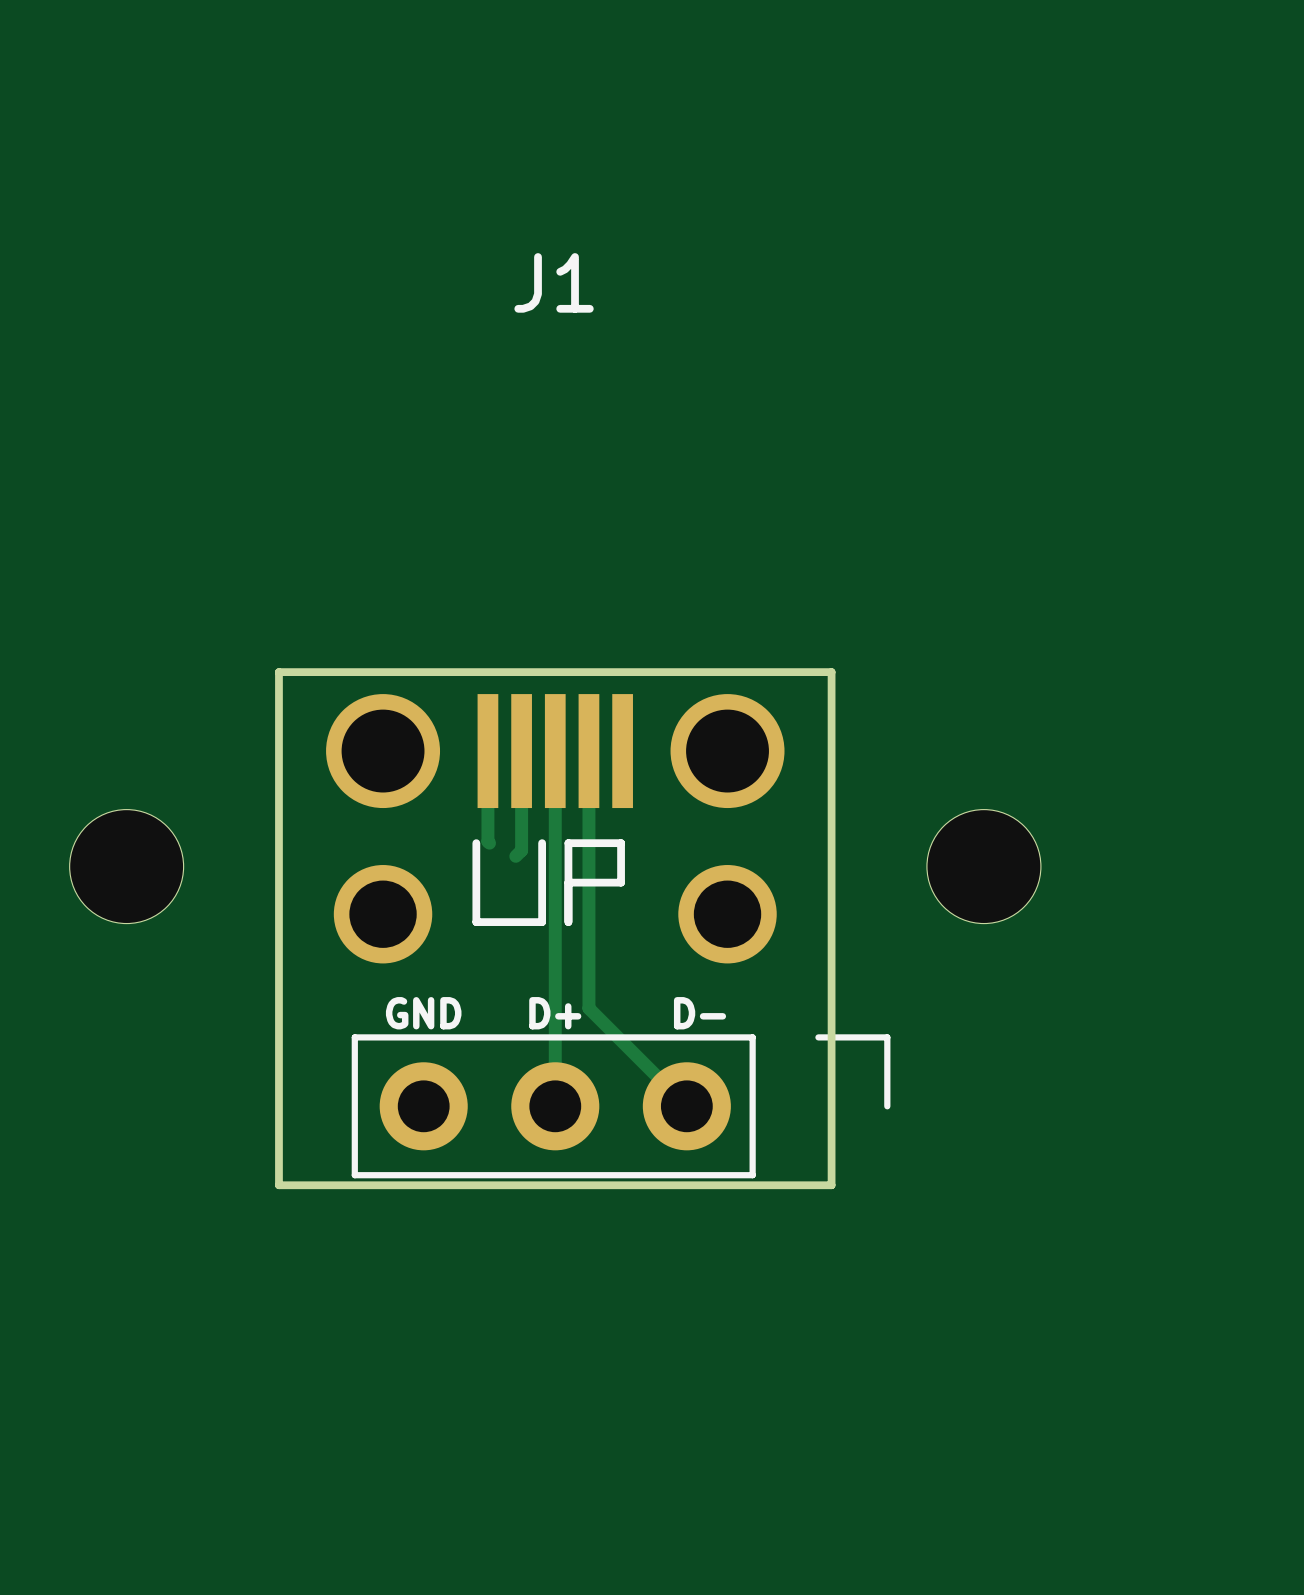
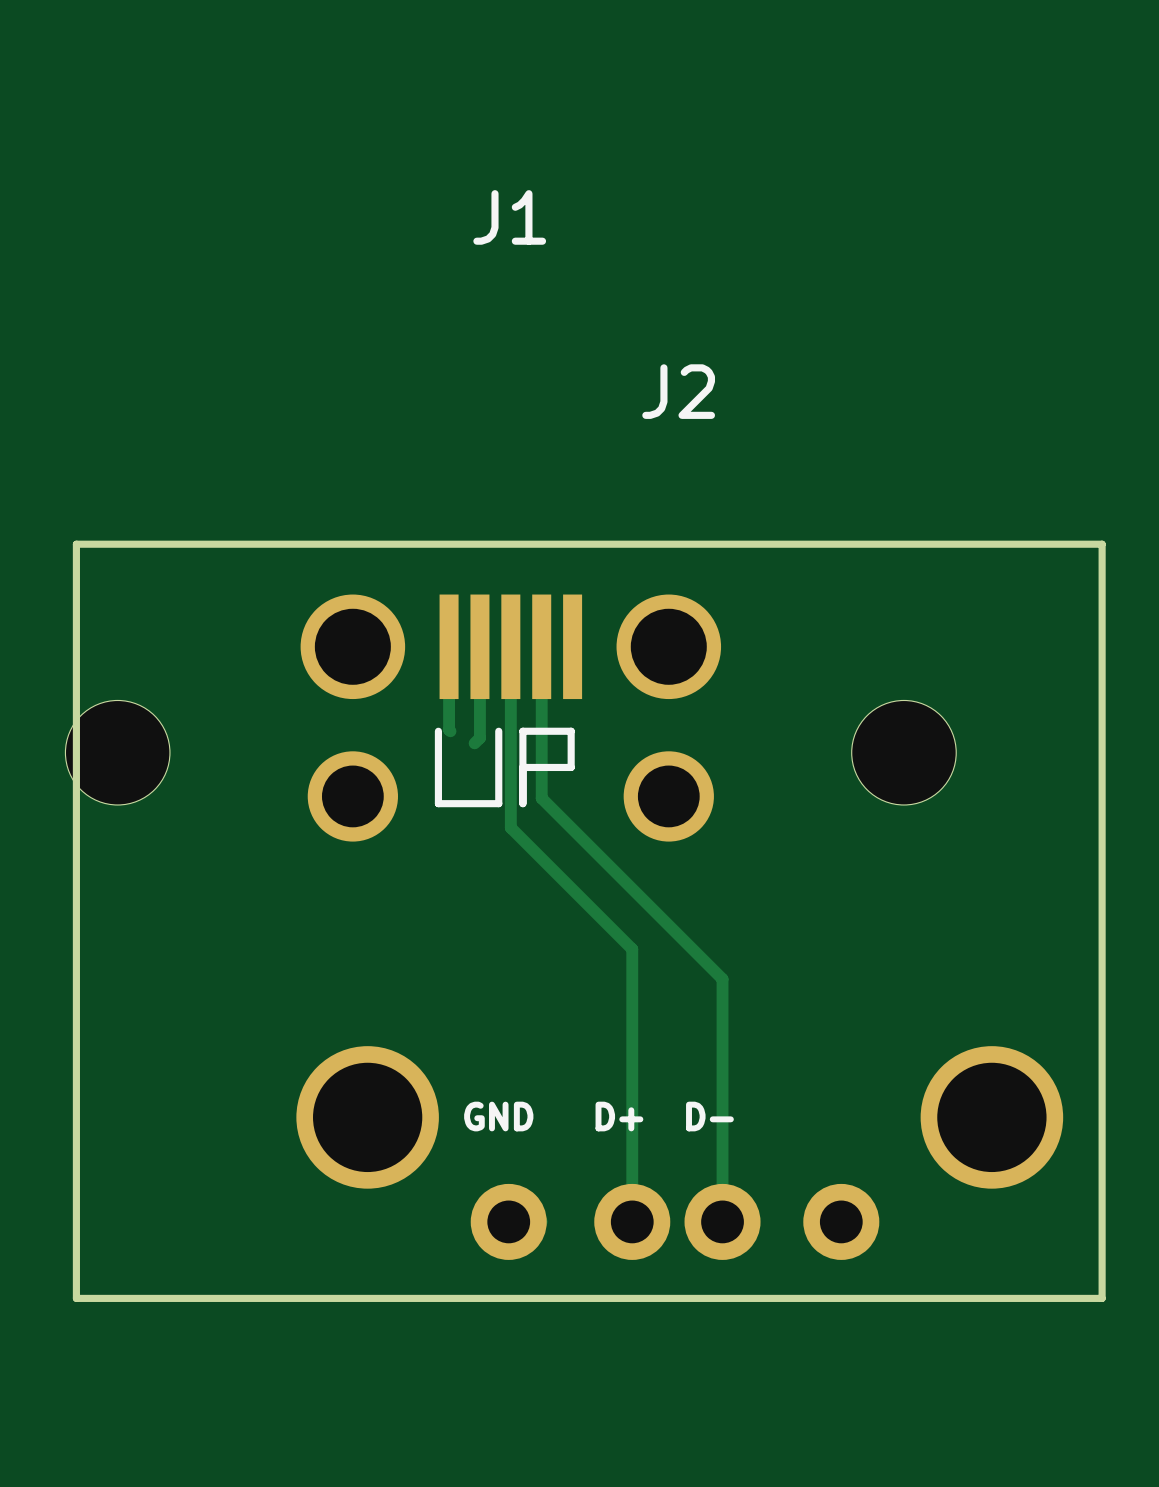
board edge: none -> (76, 544) (76, 1298) (1102, 1298) (1102, 544) (76, 544)
board edge: (278, 672) (831, 672) (831, 1185) (278, 1185) (278, 672) -> none
track: (588, 916) (588, 1008) (686, 1106) -> (541, 798) (722, 979) (722, 1221)
track: (555, 948) (555, 1106) -> (510, 827) (632, 949) (632, 1221)
text position: GND (423, 1013) -> GND (498, 1116)
text position: D+ (555, 1013) -> D+ (619, 1116)
text position: D- (700, 1013) -> D- (709, 1116)
part: (621, 1106) -> none
J2: none -> (679, 1153)

